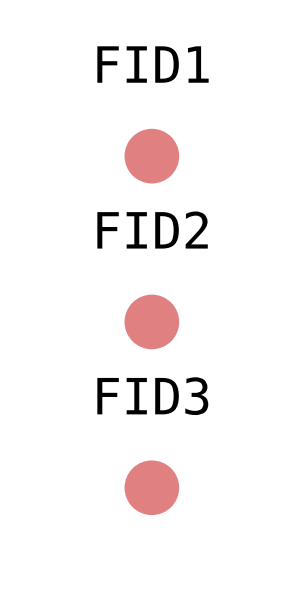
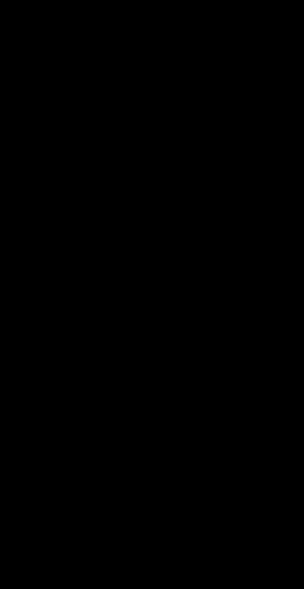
FID1: (151, 156) -> none
FID2: (151, 321) -> none
FID3: (151, 487) -> none

